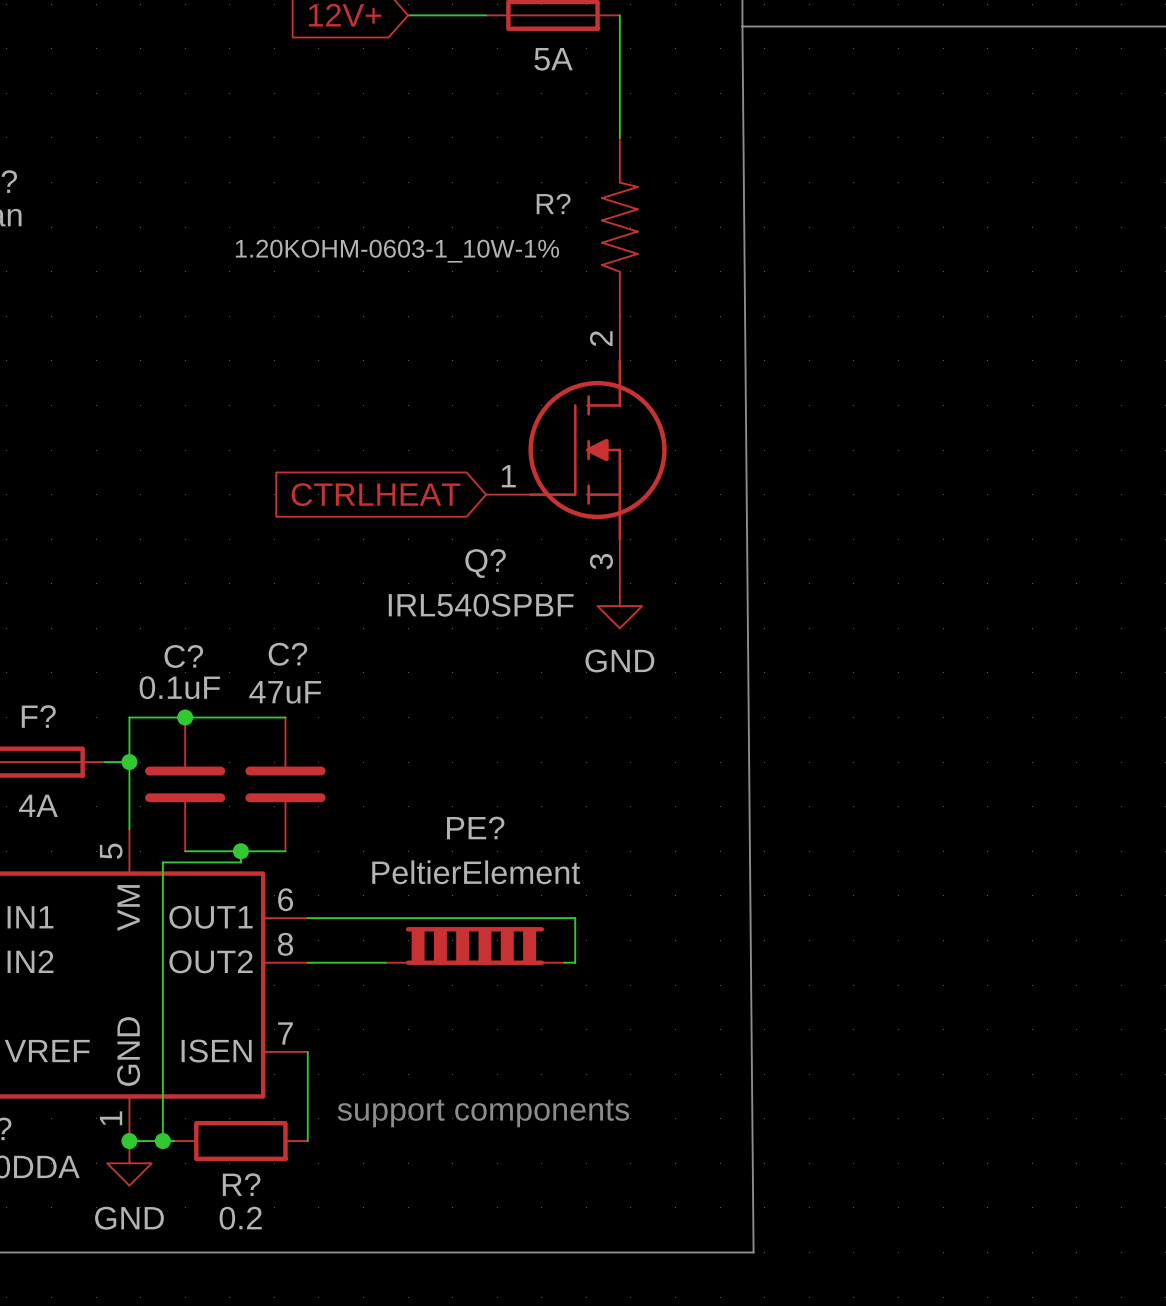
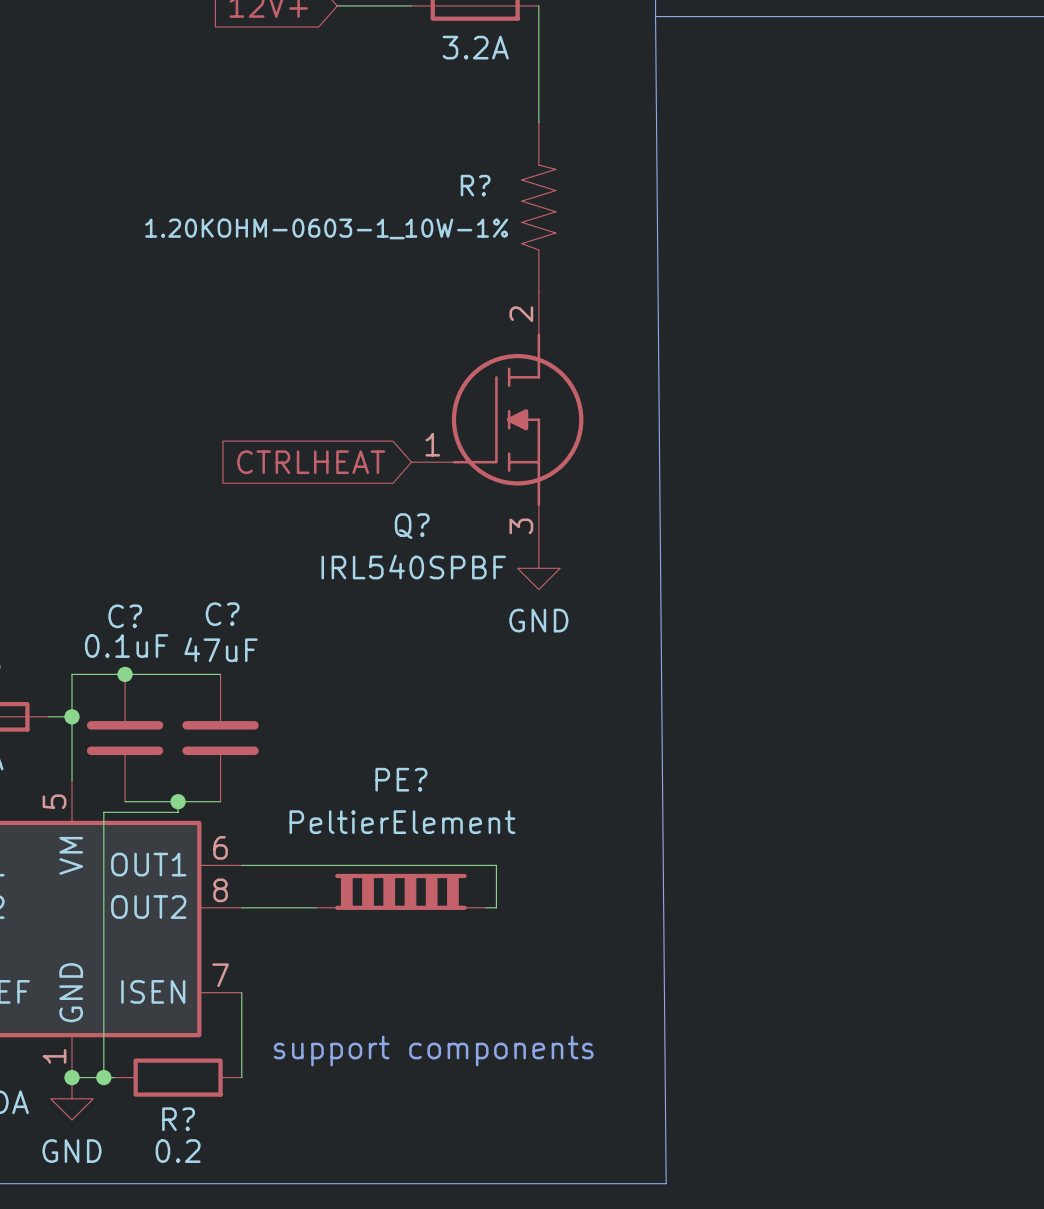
part value: 5A (553, 59) -> 3.2A (475, 47)

